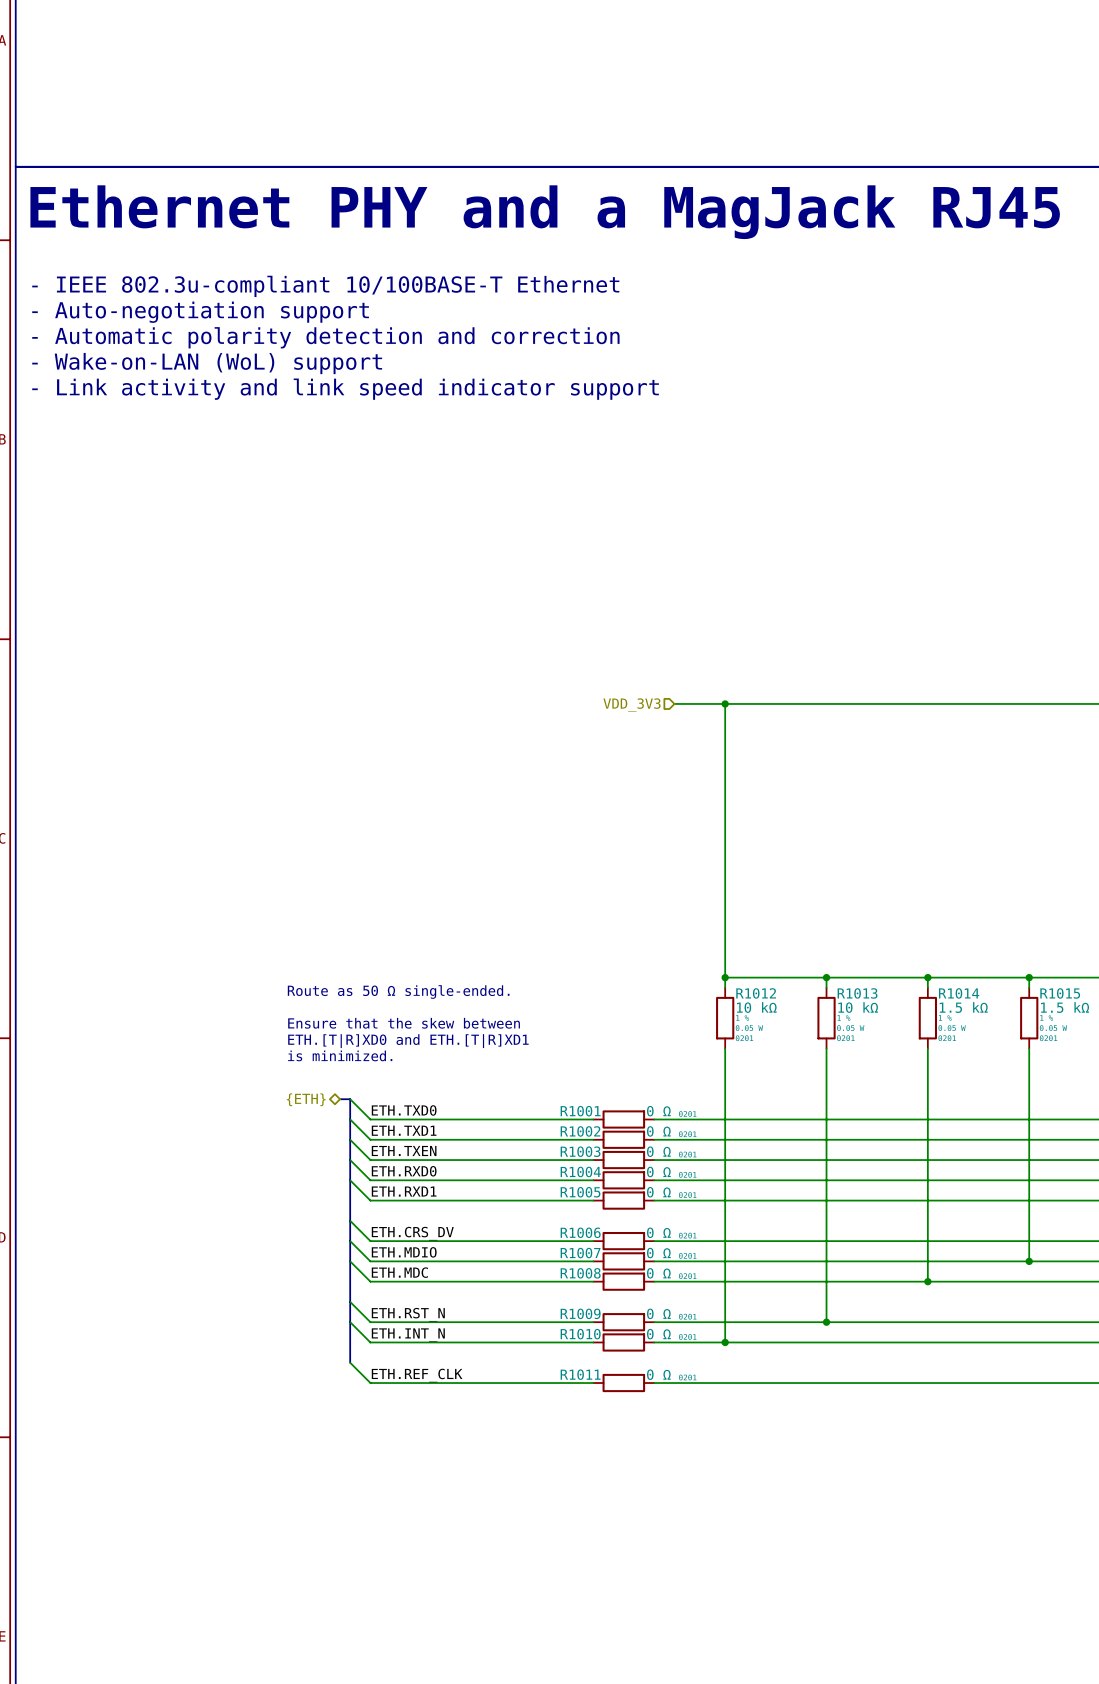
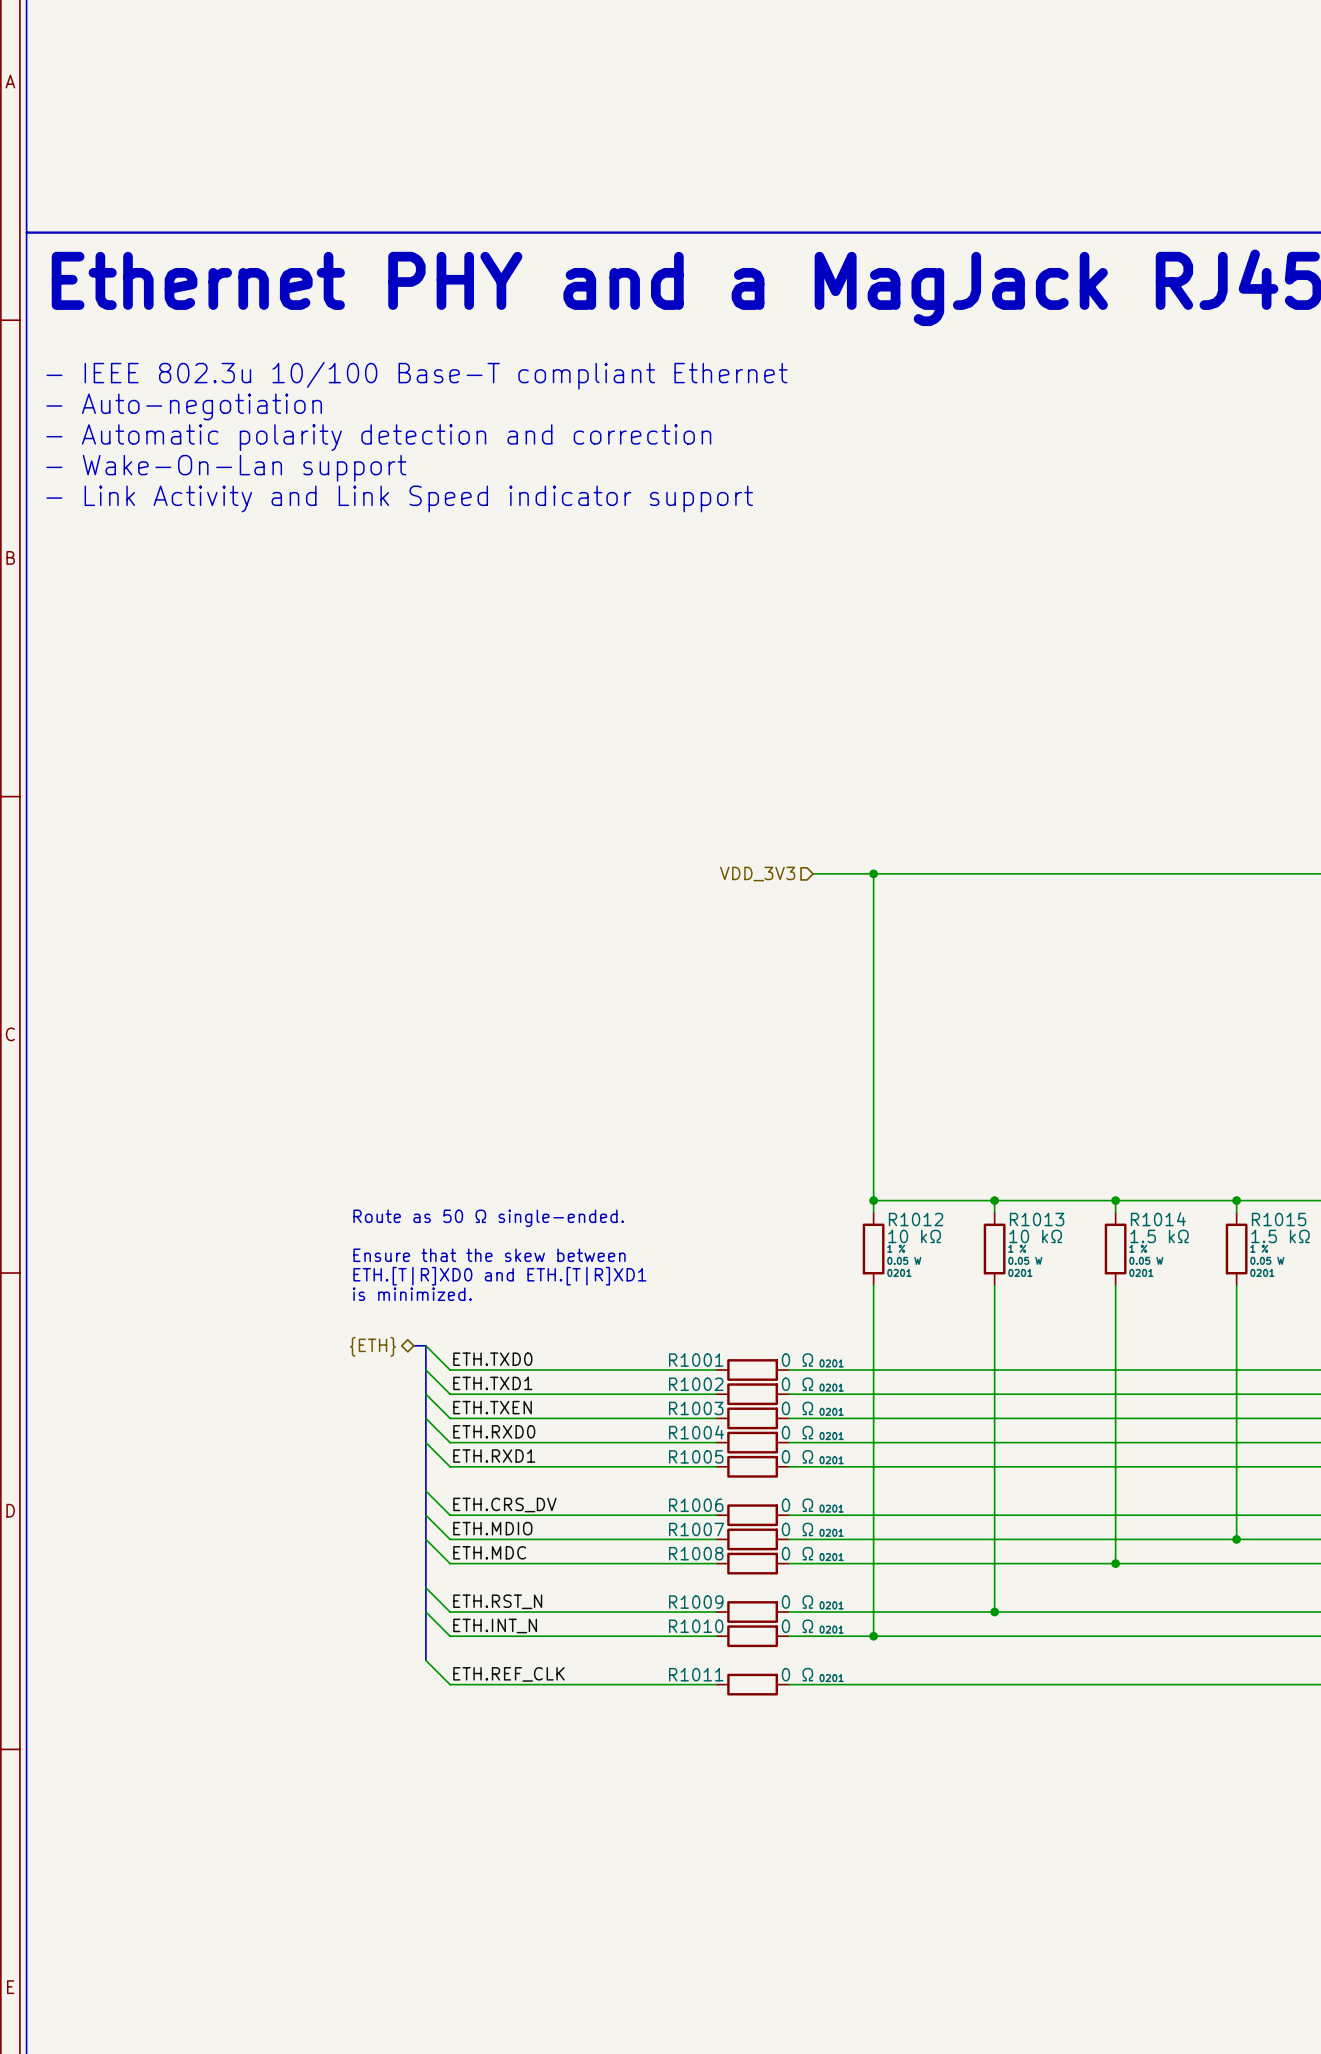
text: - IEEE 802.3u-compliant 10/100BASE-T Ethernet (325, 286) -> - IEEE 802.3u 10/100 Base-T compliant Ethernet (416, 375)
text: - Auto-negotiation support (200, 312) -> - Auto-negotiation (184, 406)
text: - Wake-on-LAN (WoL) support (207, 363) -> - Wake-On-Lan support (226, 468)
text: - Link activity and link speed indicator support (345, 389) -> - Link Activity and Link Speed indicator support (399, 498)

